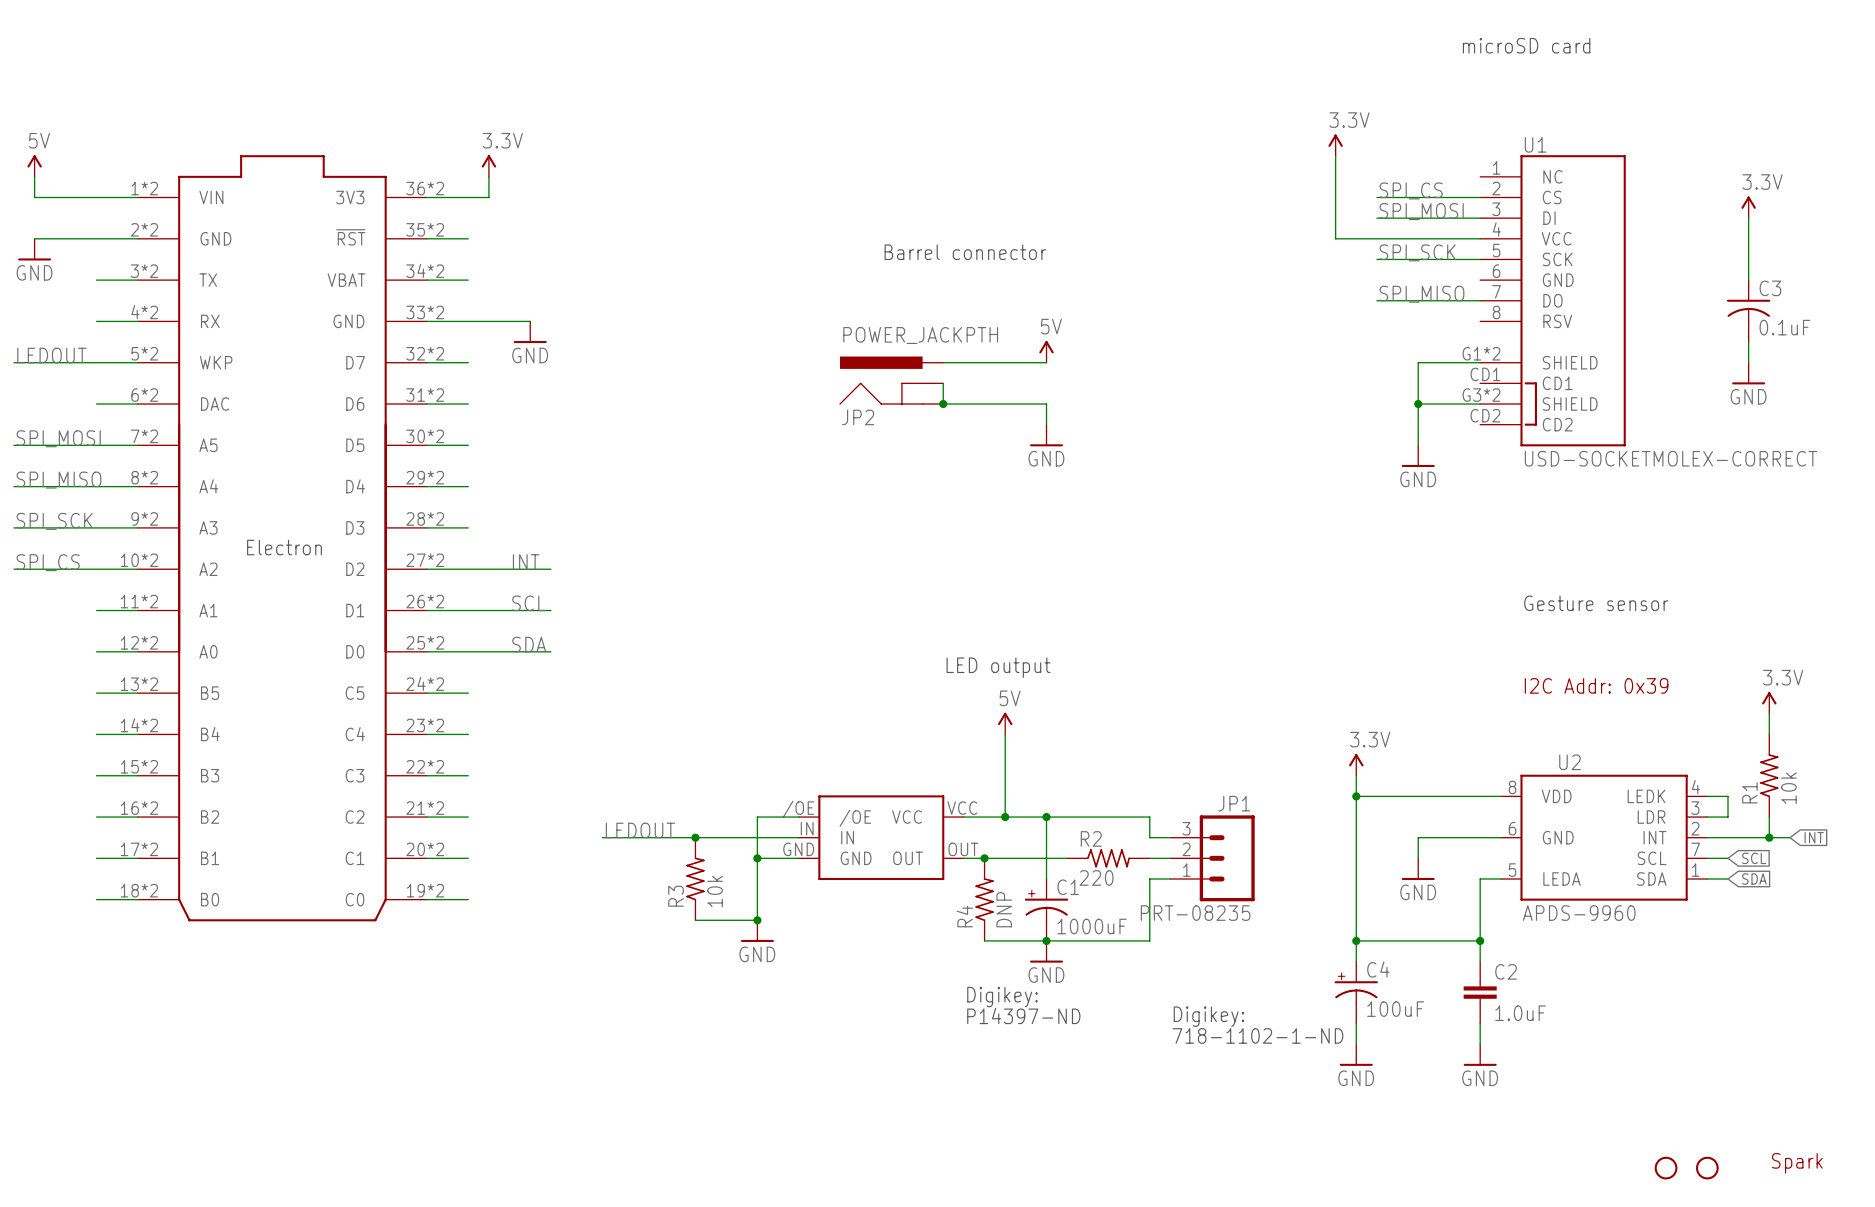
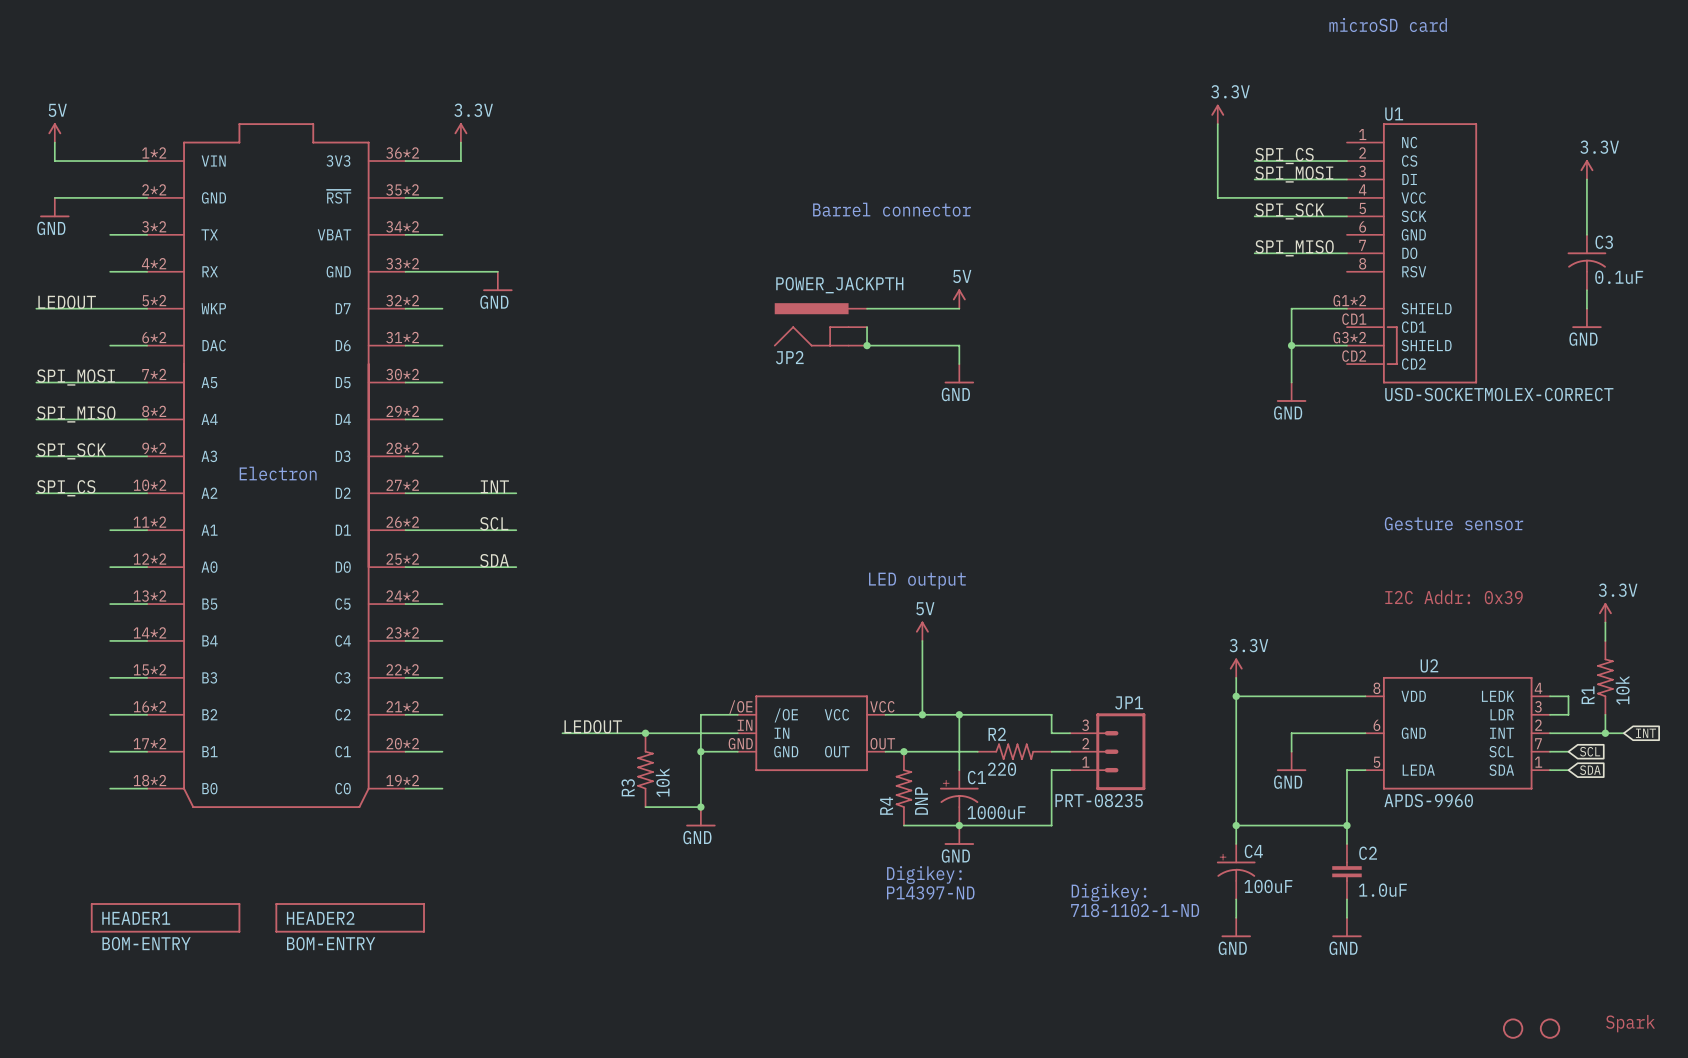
HEADER1: none -> BOM-ENTRY (165, 917)
HEADER2: none -> BOM-ENTRY (350, 917)

